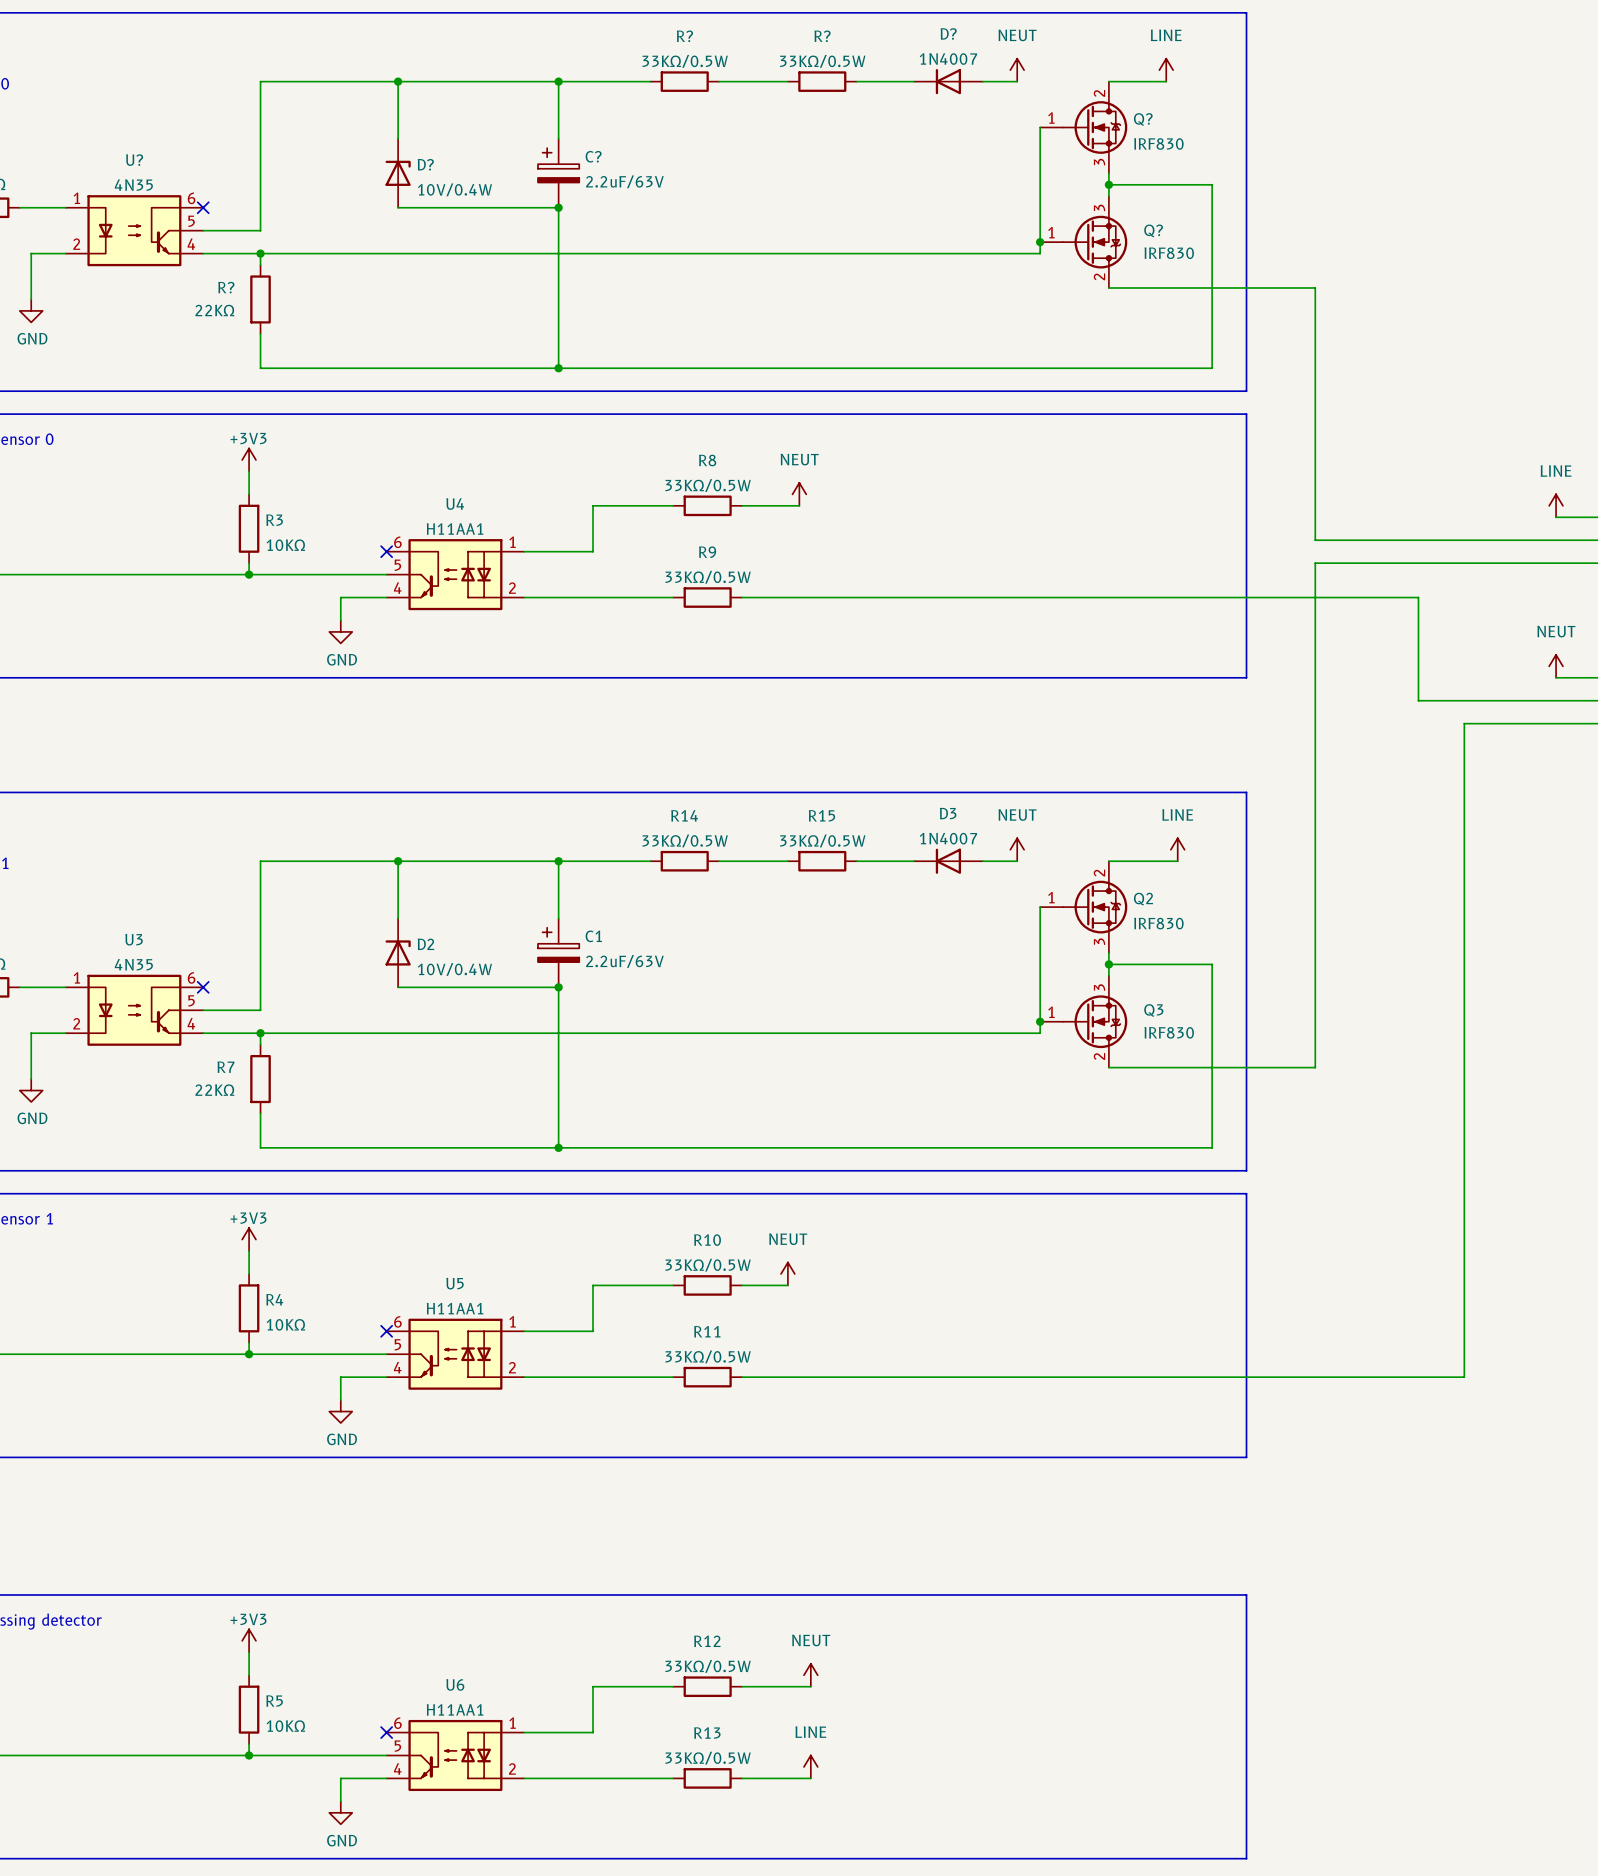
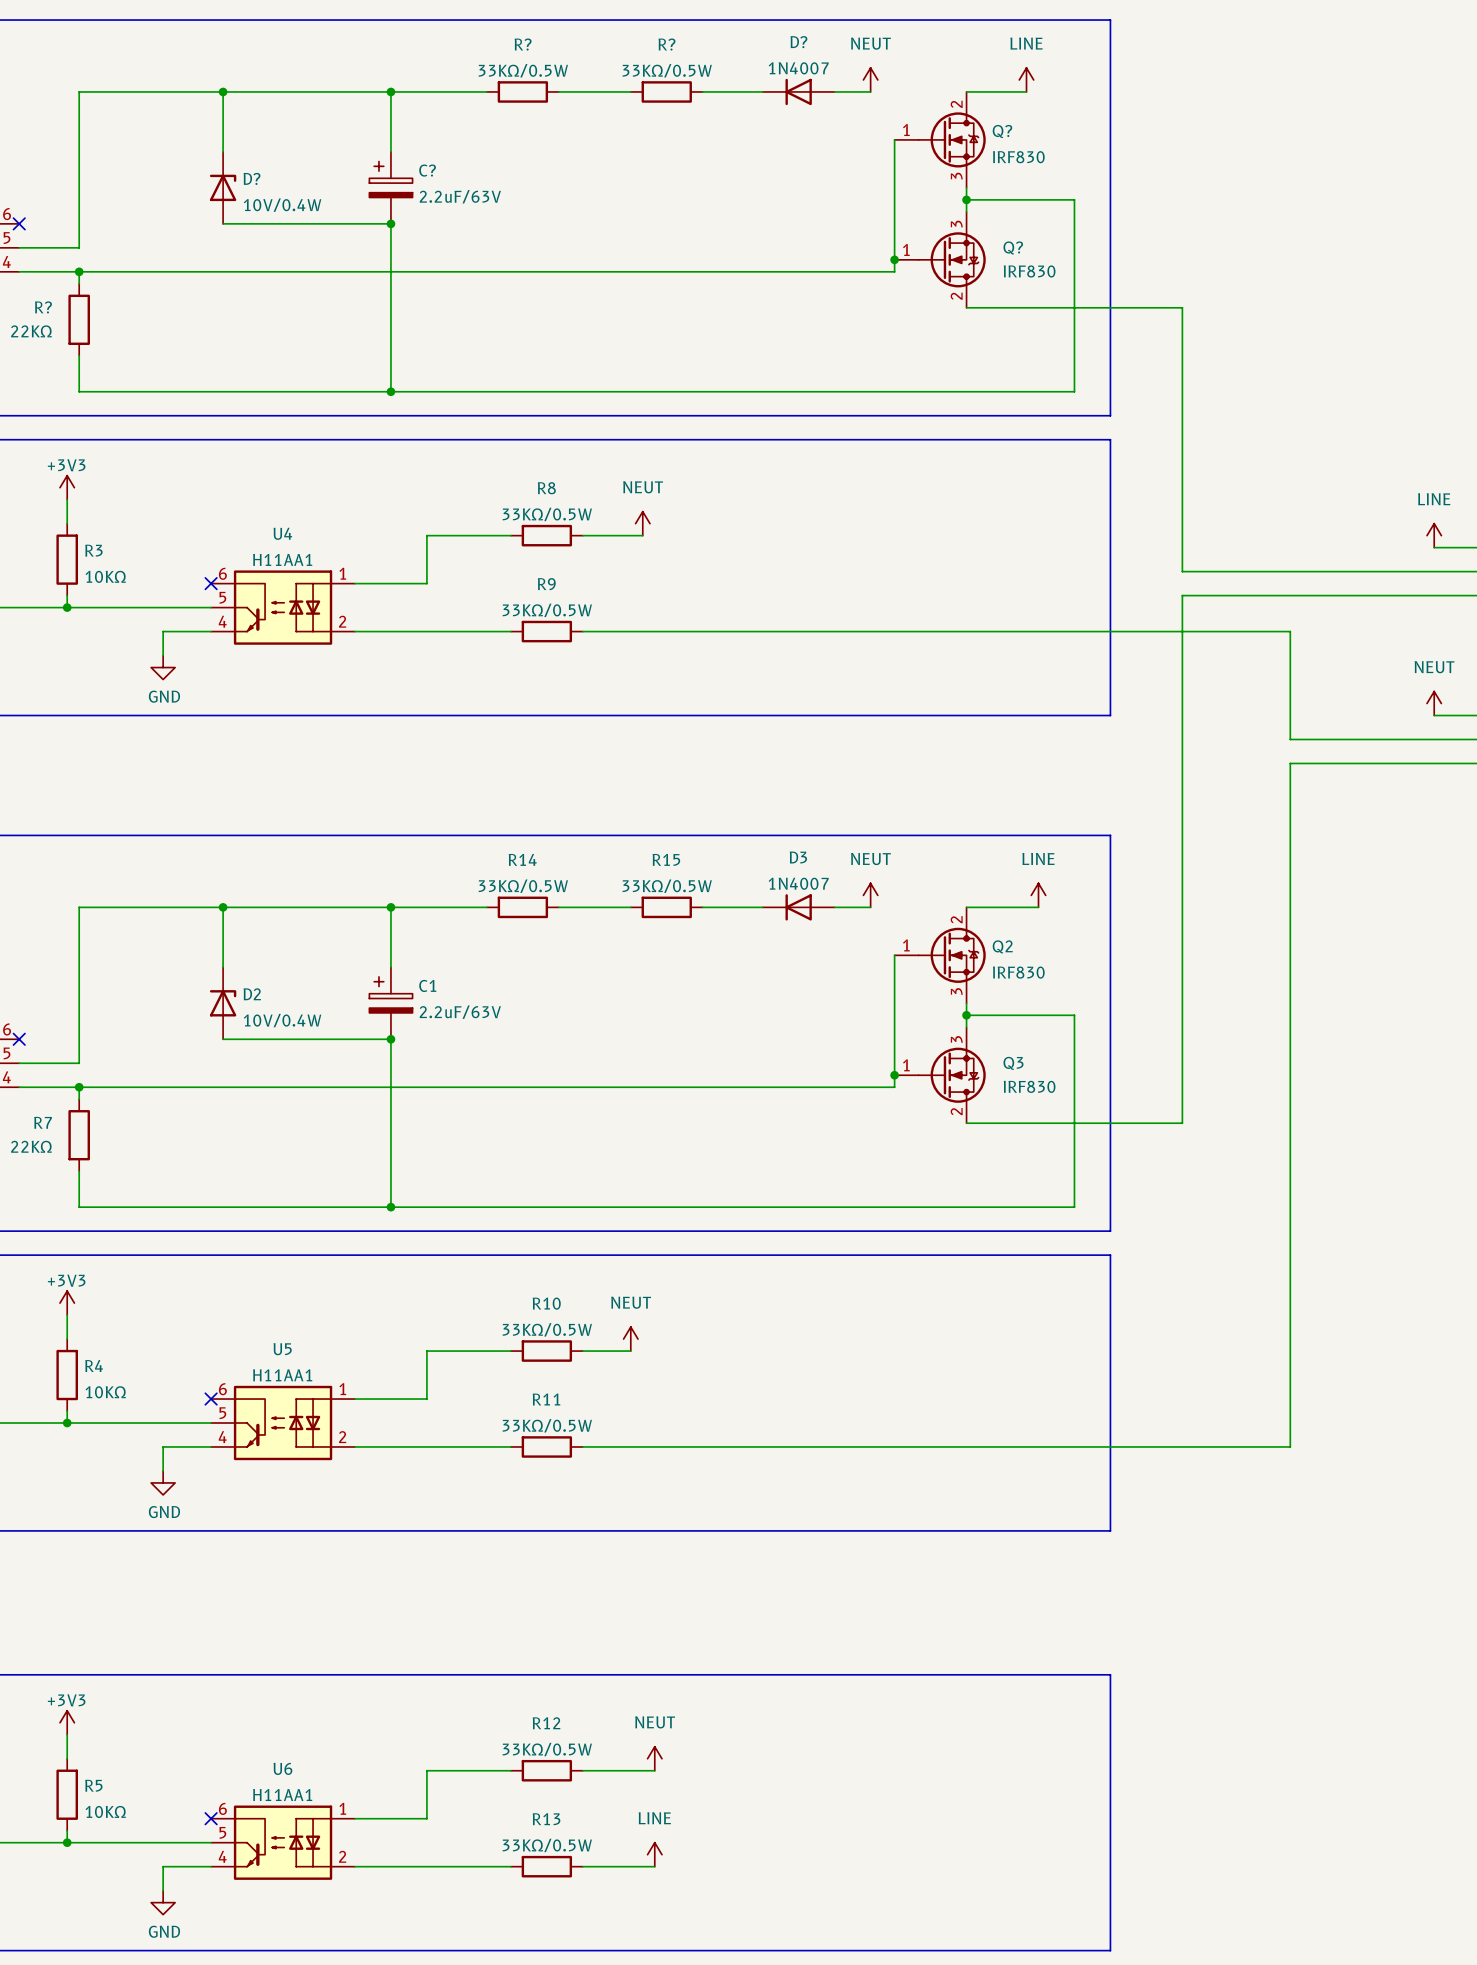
wire: (1464, 723) (1464, 1377) (1418, 1377) -> (1338, 763) (1290, 763) (1290, 1446)

